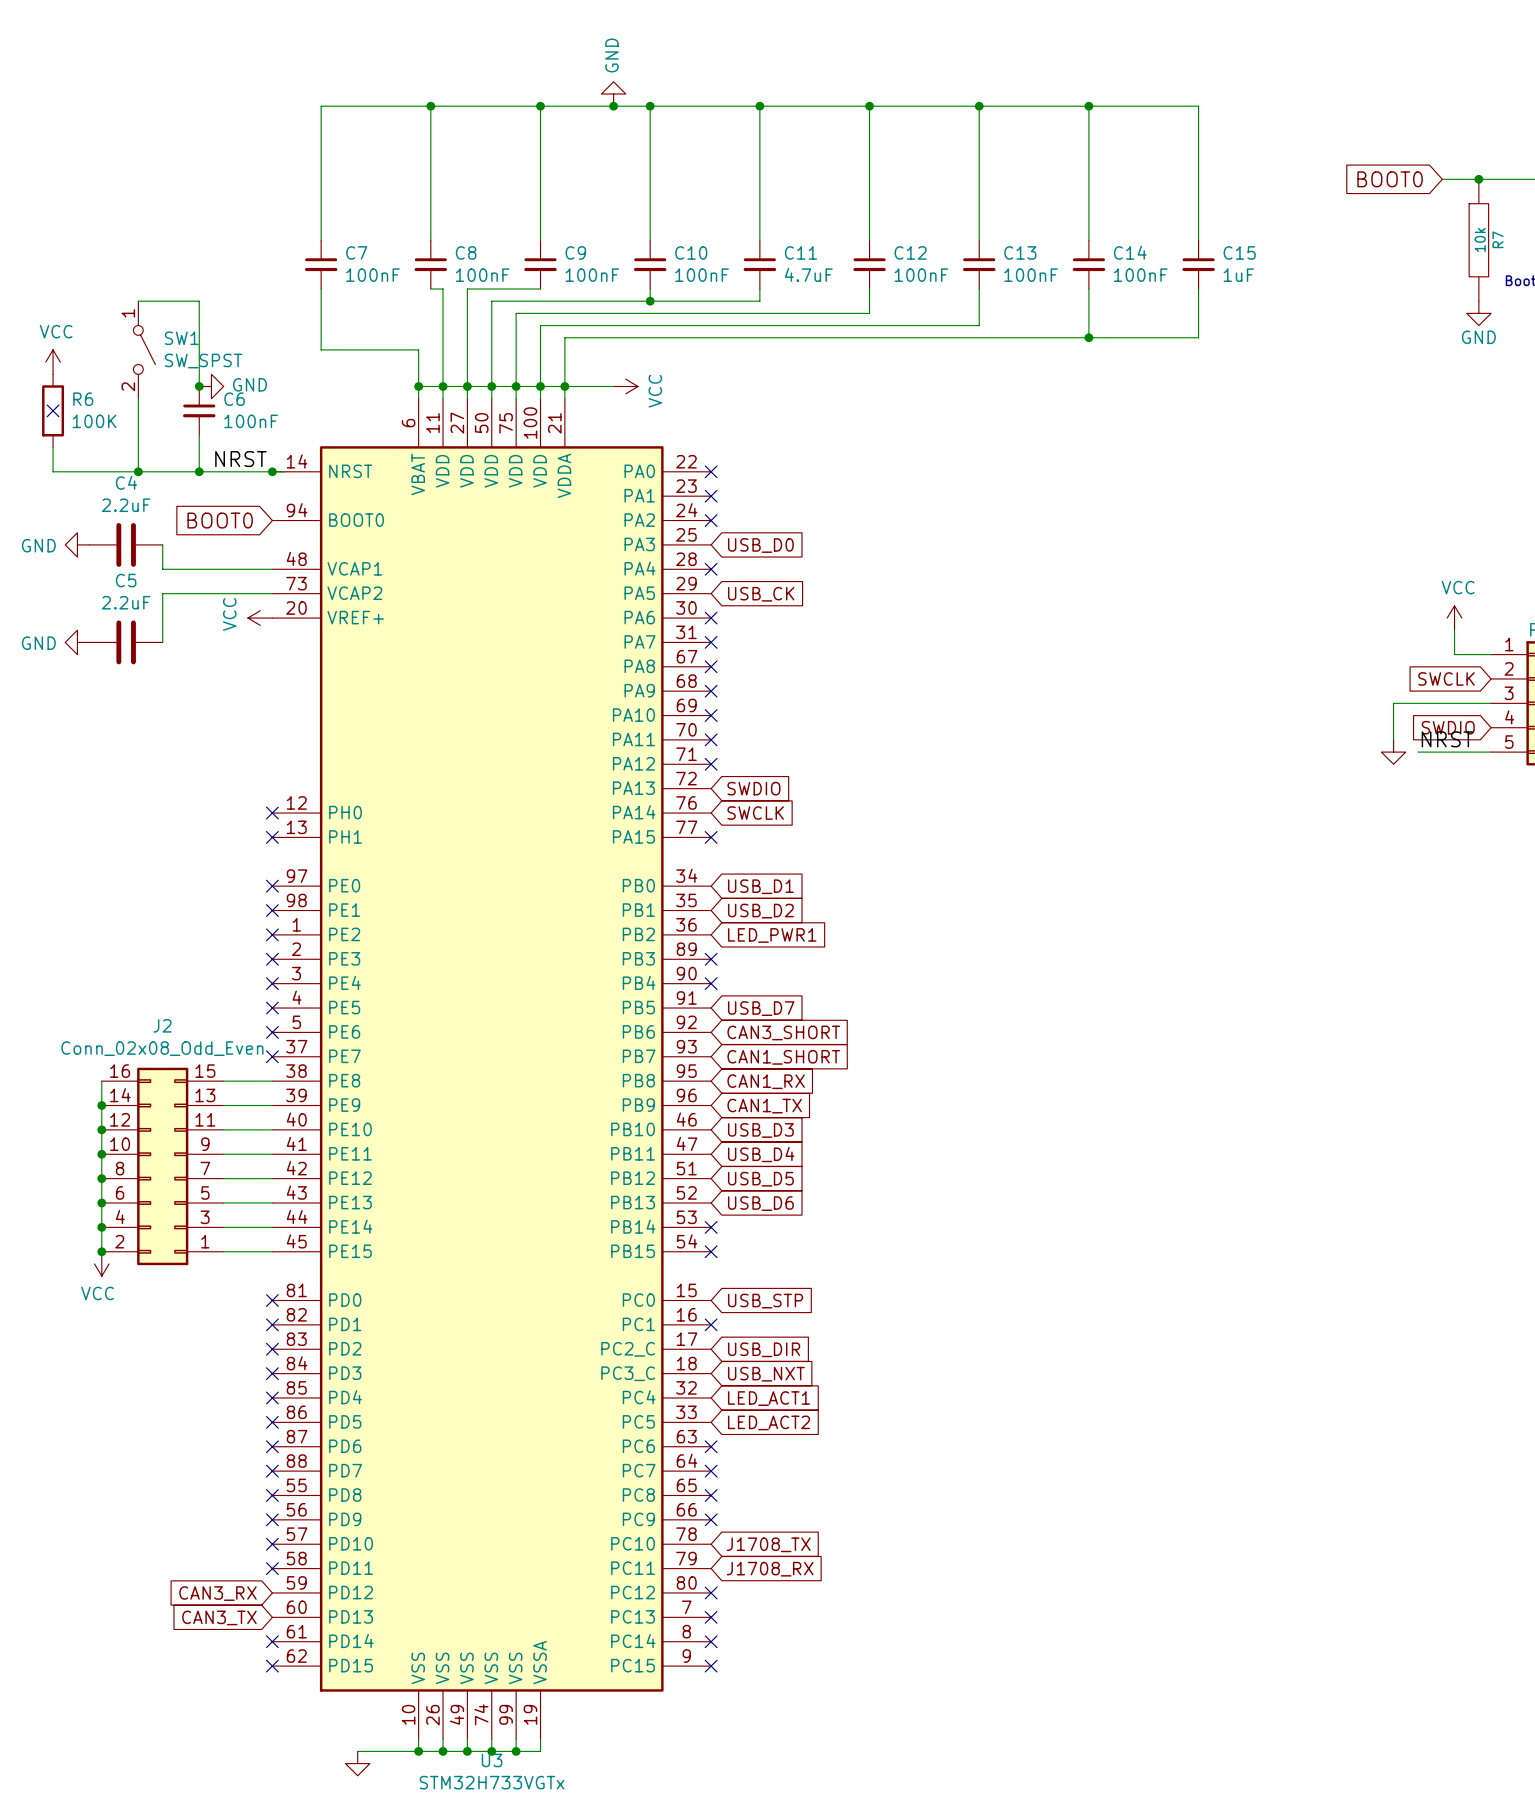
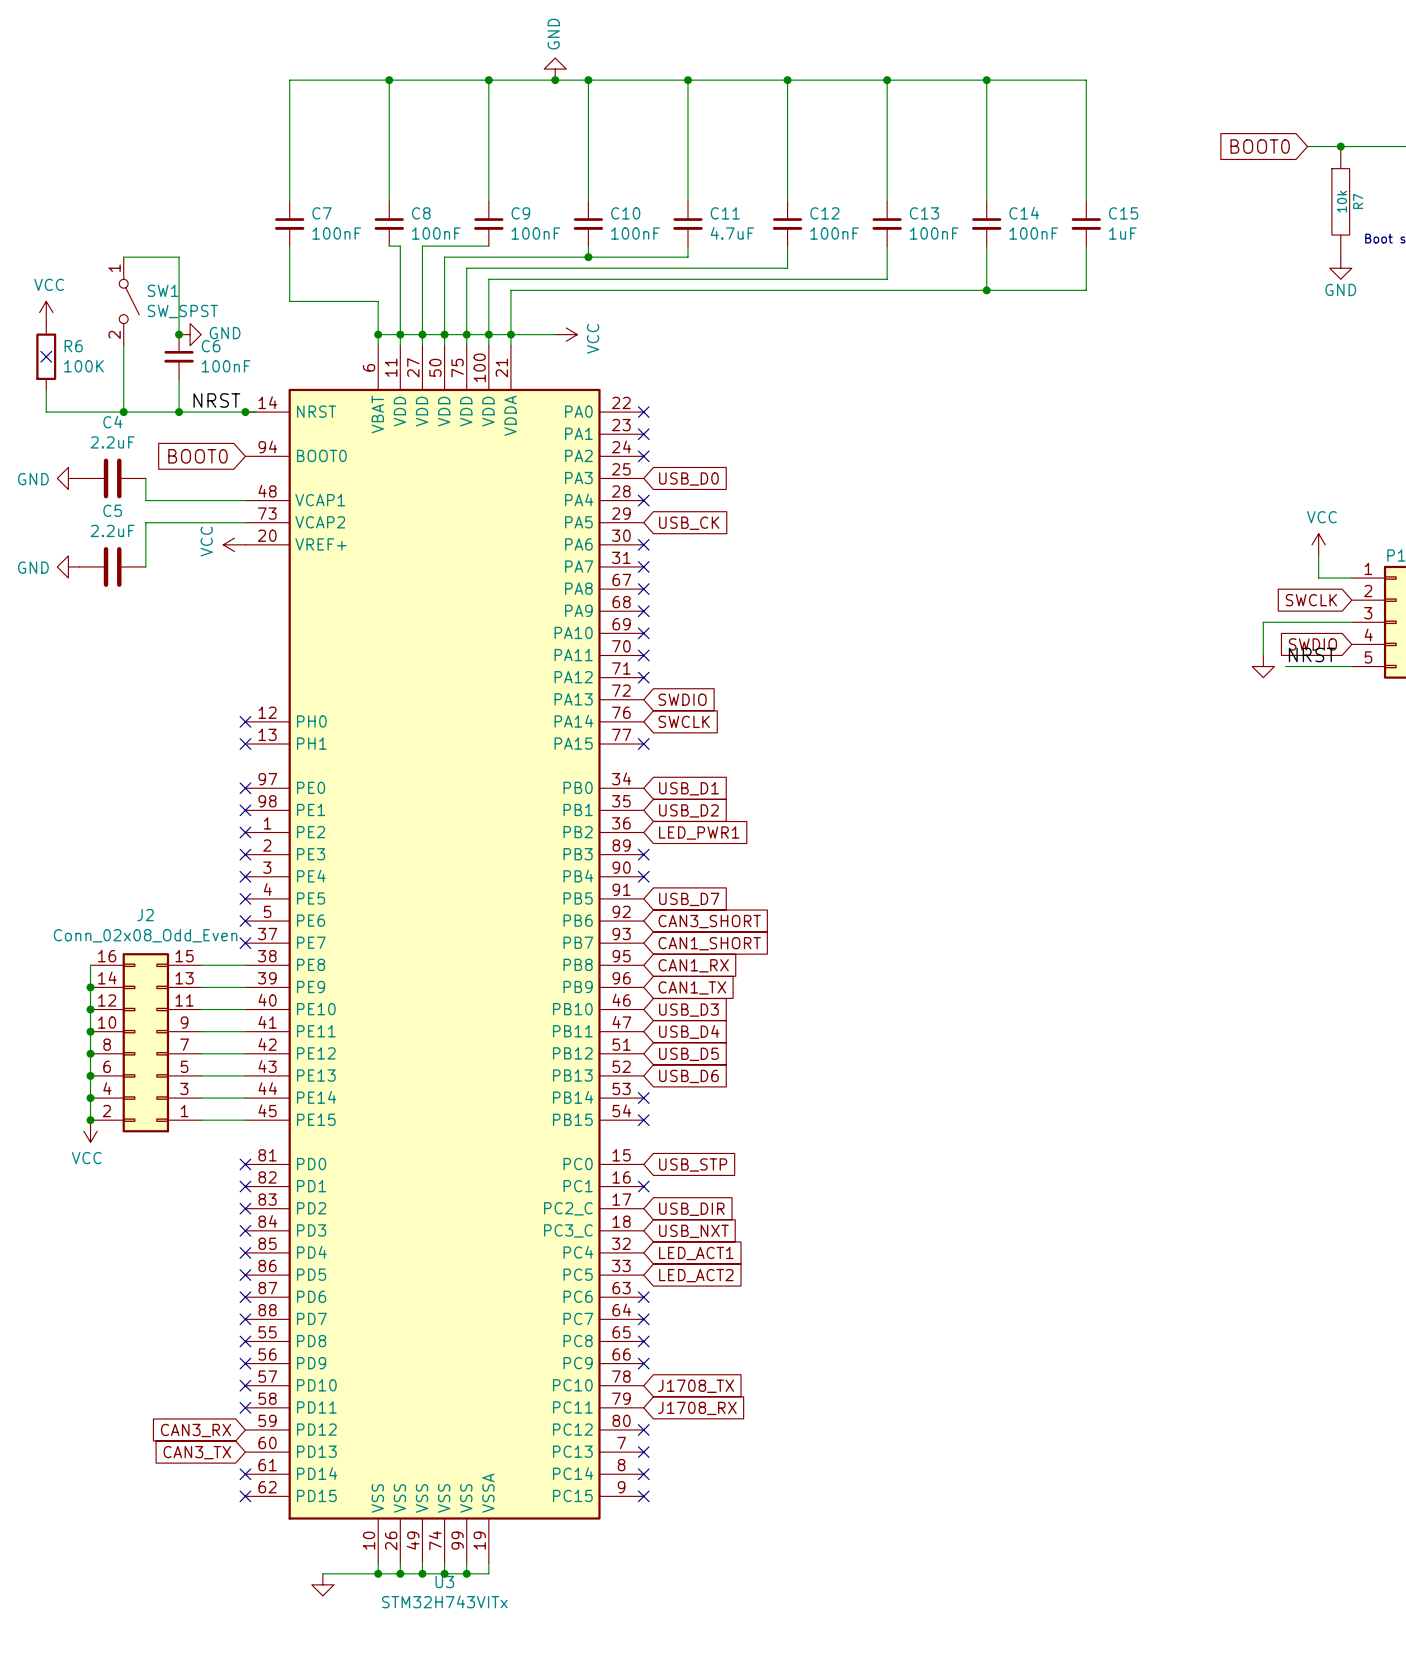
U3 value: STM32H733VGTx (492, 1782) -> STM32H743VITx (444, 1601)

